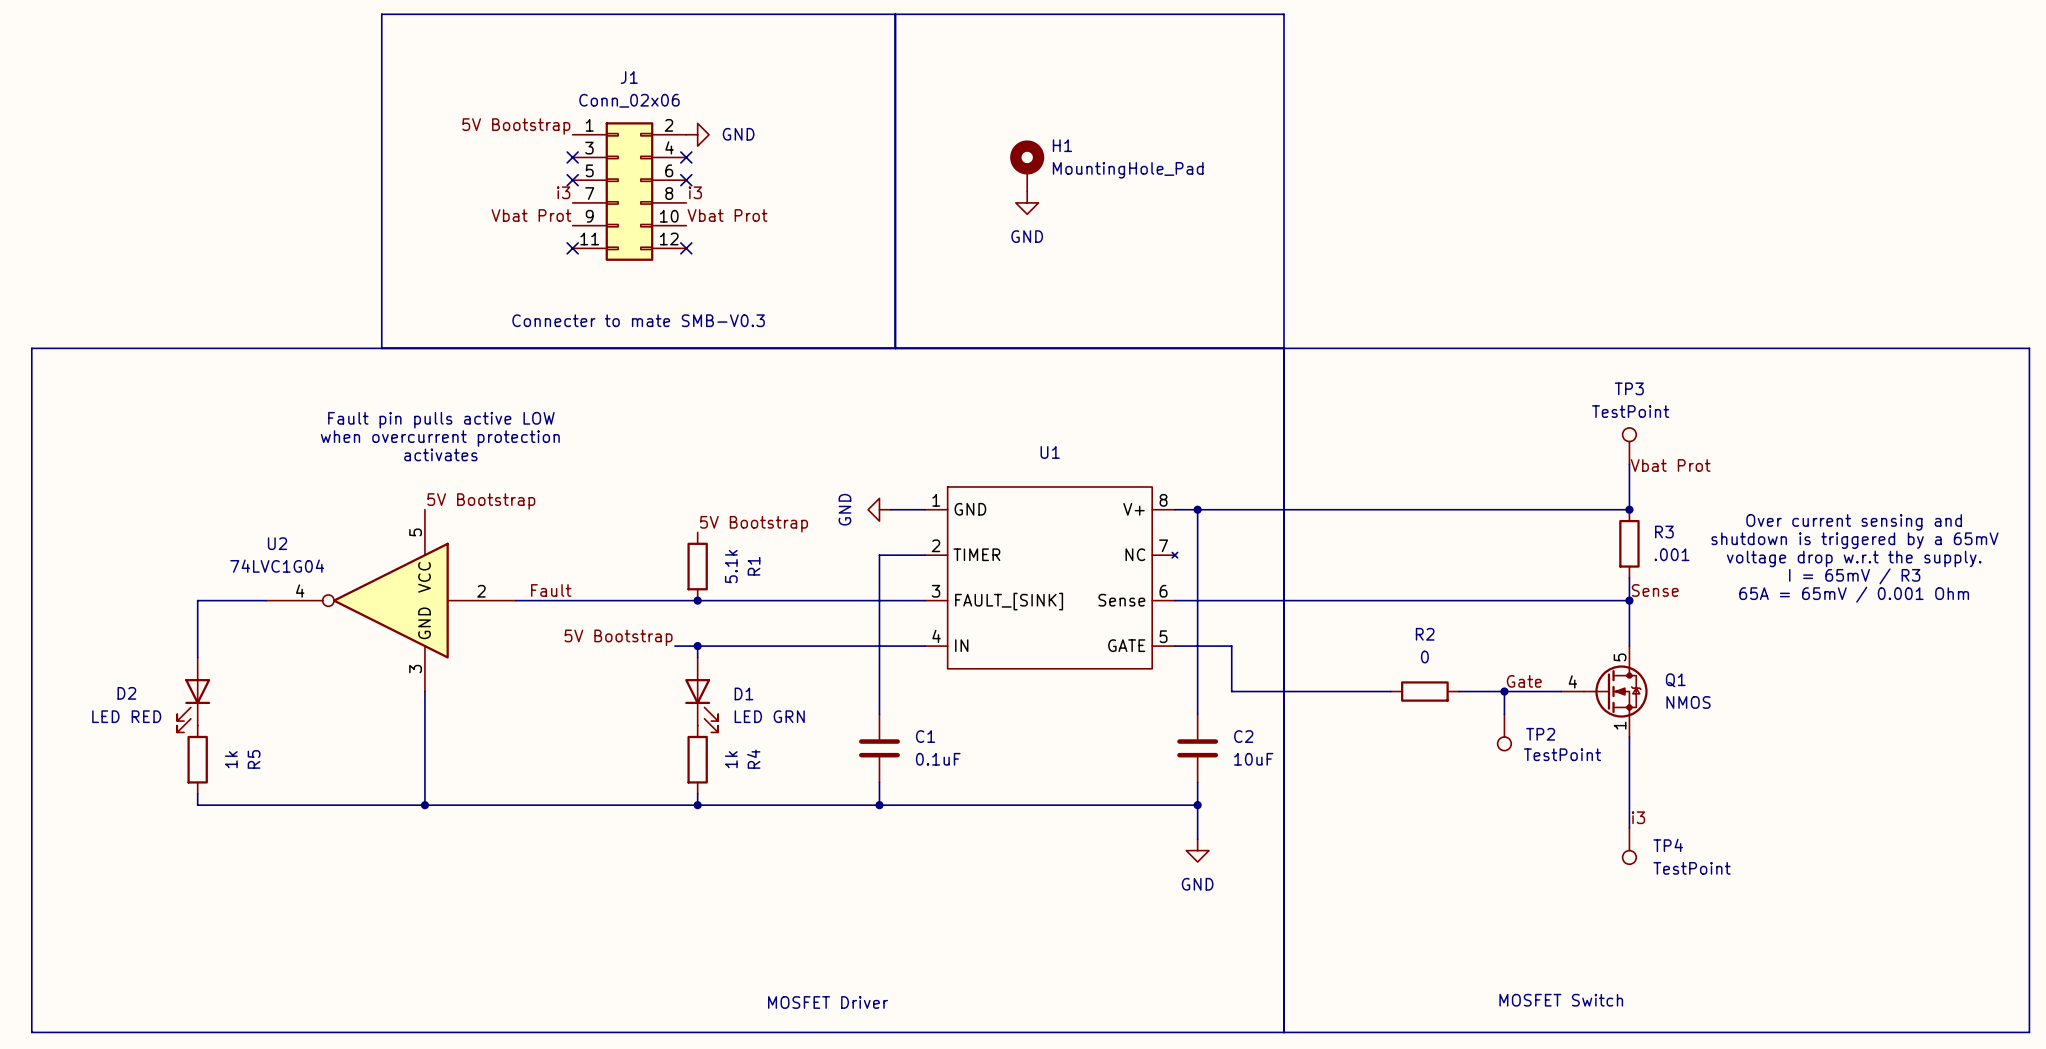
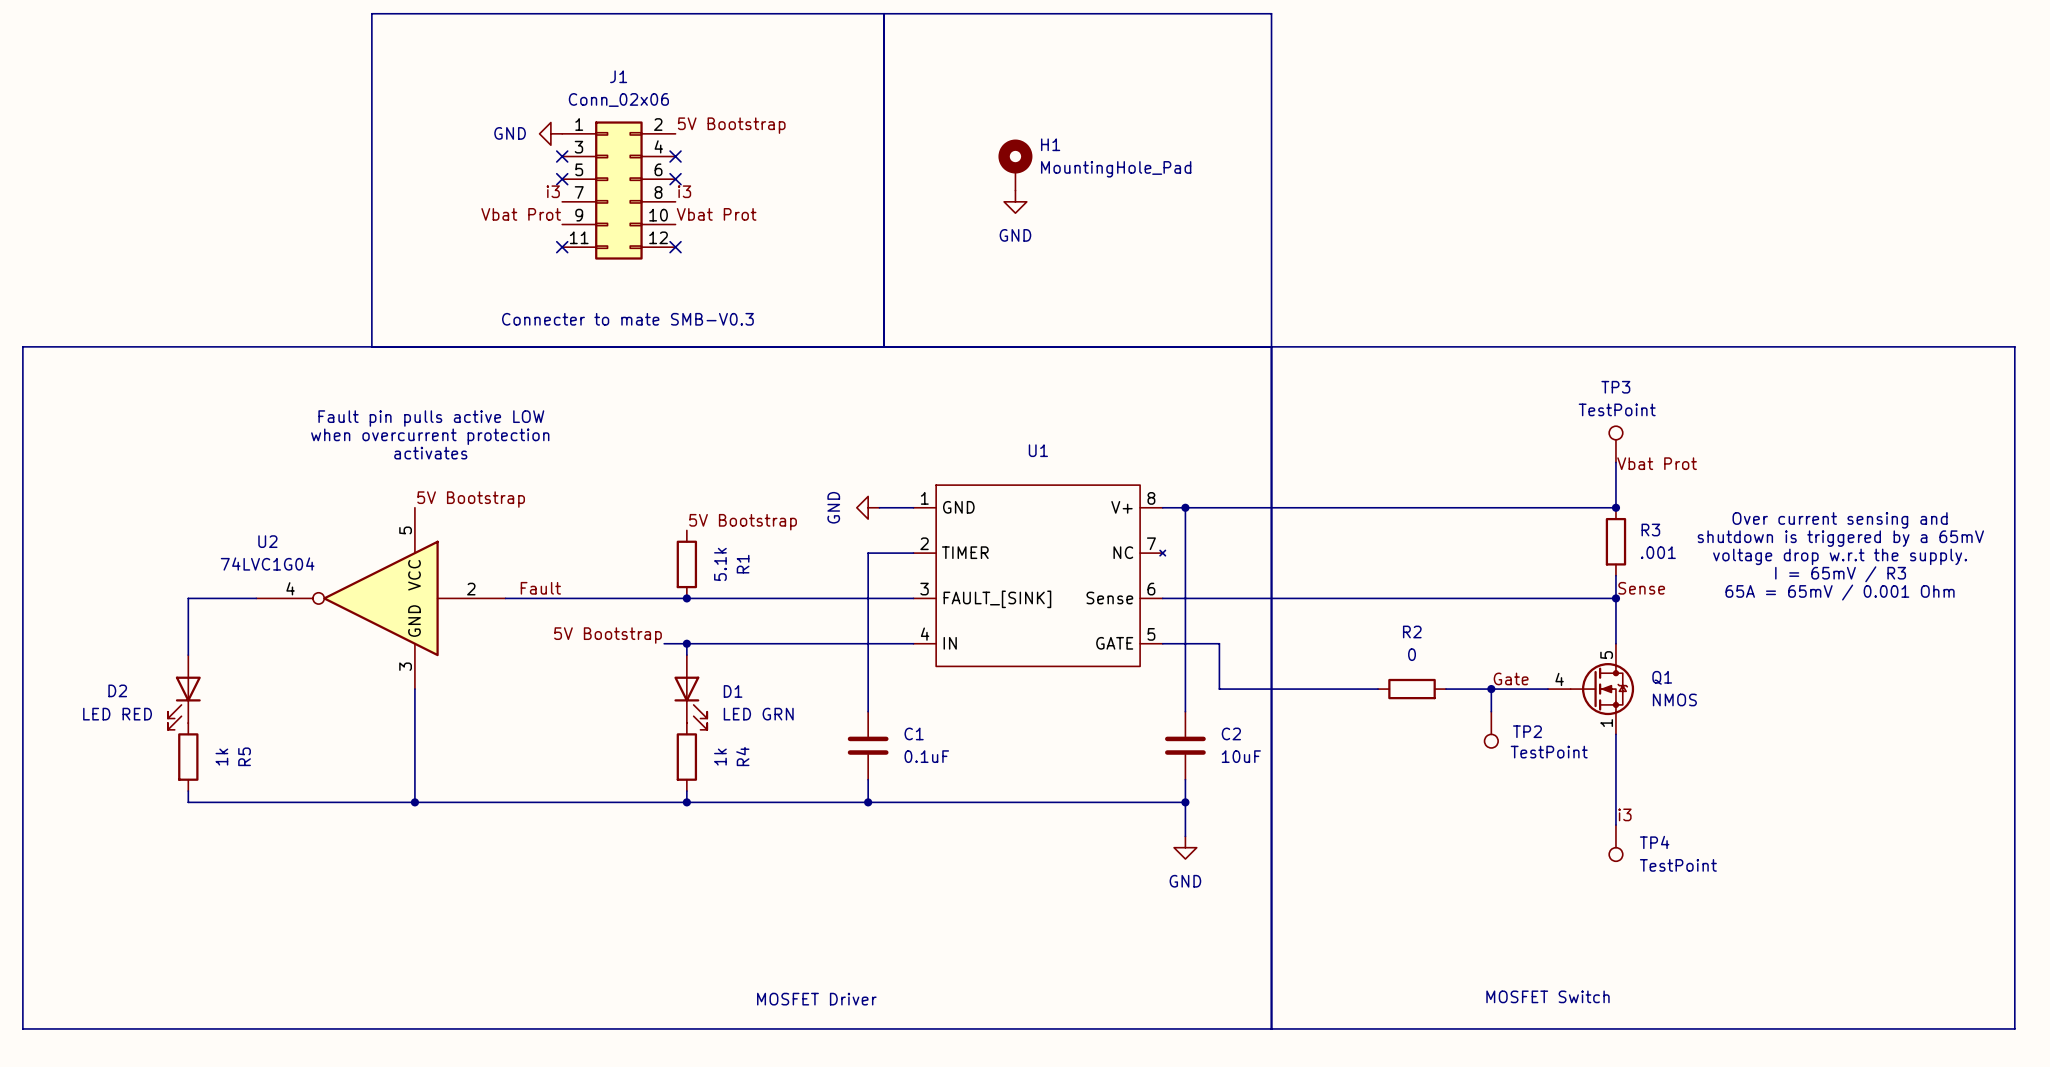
label position: 5V Bootstrap (516, 126) -> 5V Bootstrap (731, 125)
power symbol rotation: 0° (697, 134) -> 180° (550, 133)
power symbol position: GND (697, 134) -> GND (550, 133)

